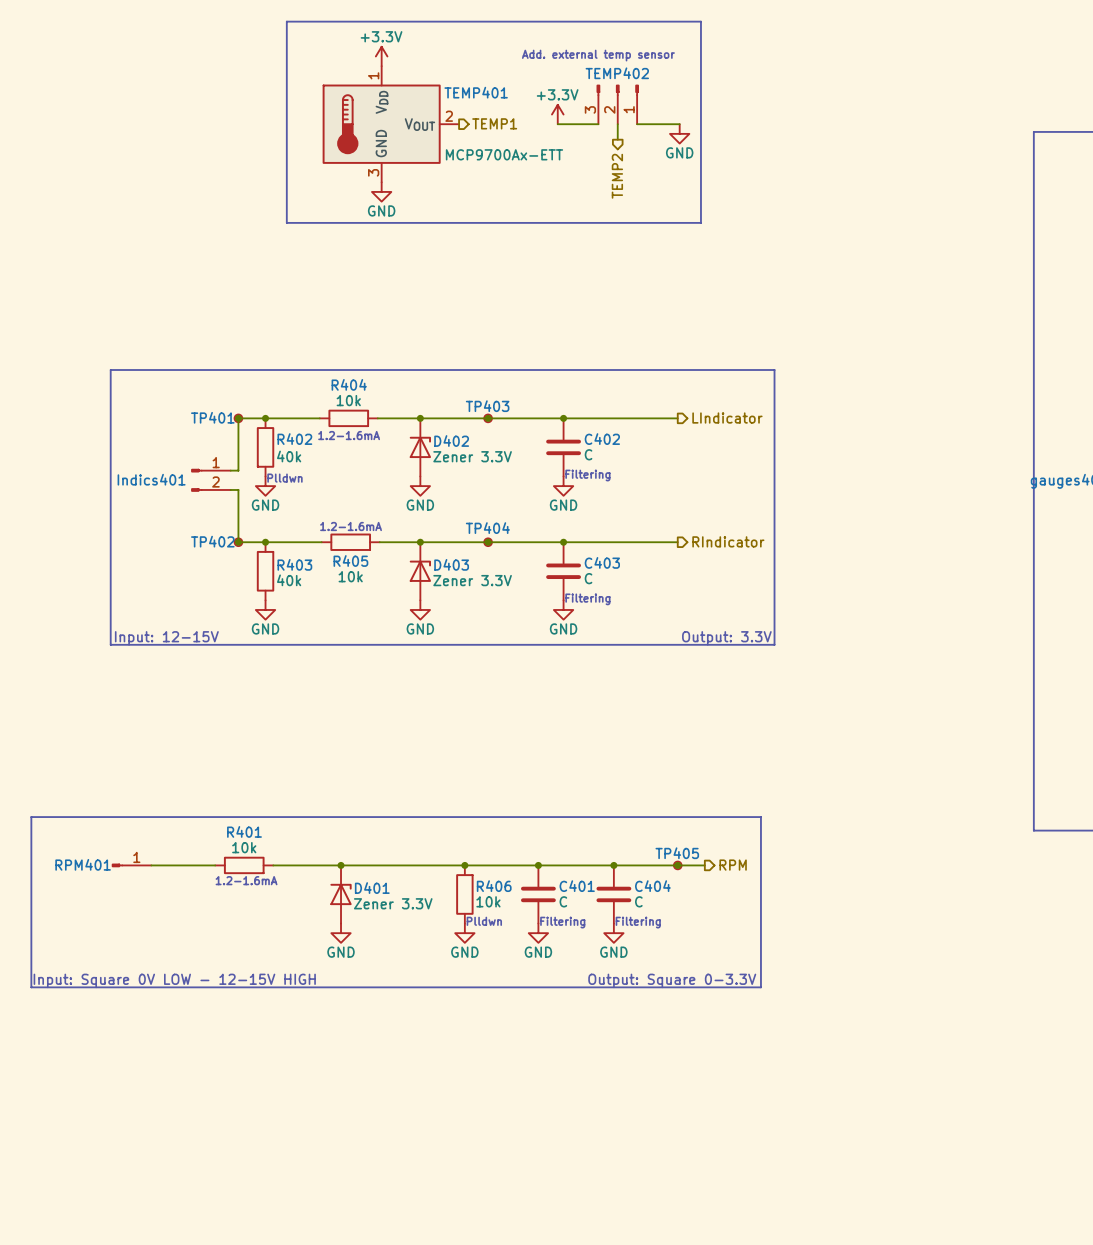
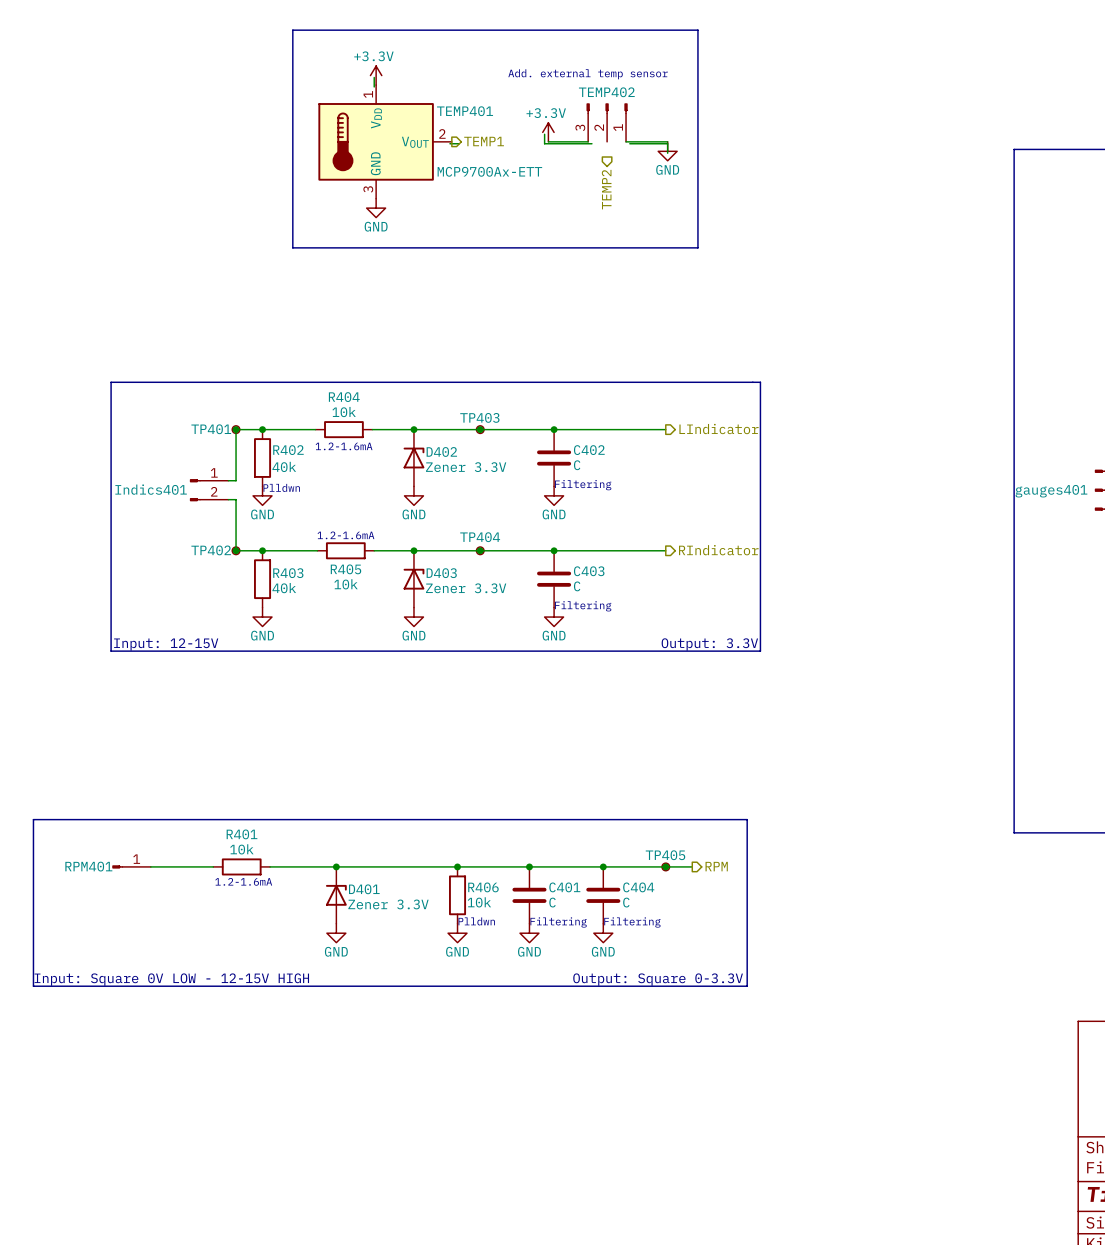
line: (286, 21) (700, 21) (700, 222) (286, 222) (286, 21) -> (292, 30) (292, 247) (697, 247) (697, 30) (292, 30)
wire: none -> (374, 77) (374, 86)
wire: none -> (544, 134) (544, 143) (591, 143)
wire: (617, 124) (617, 139) -> none
wire: none -> (449, 143) (459, 143)
wire: none -> (629, 143) (667, 143) (667, 153)

